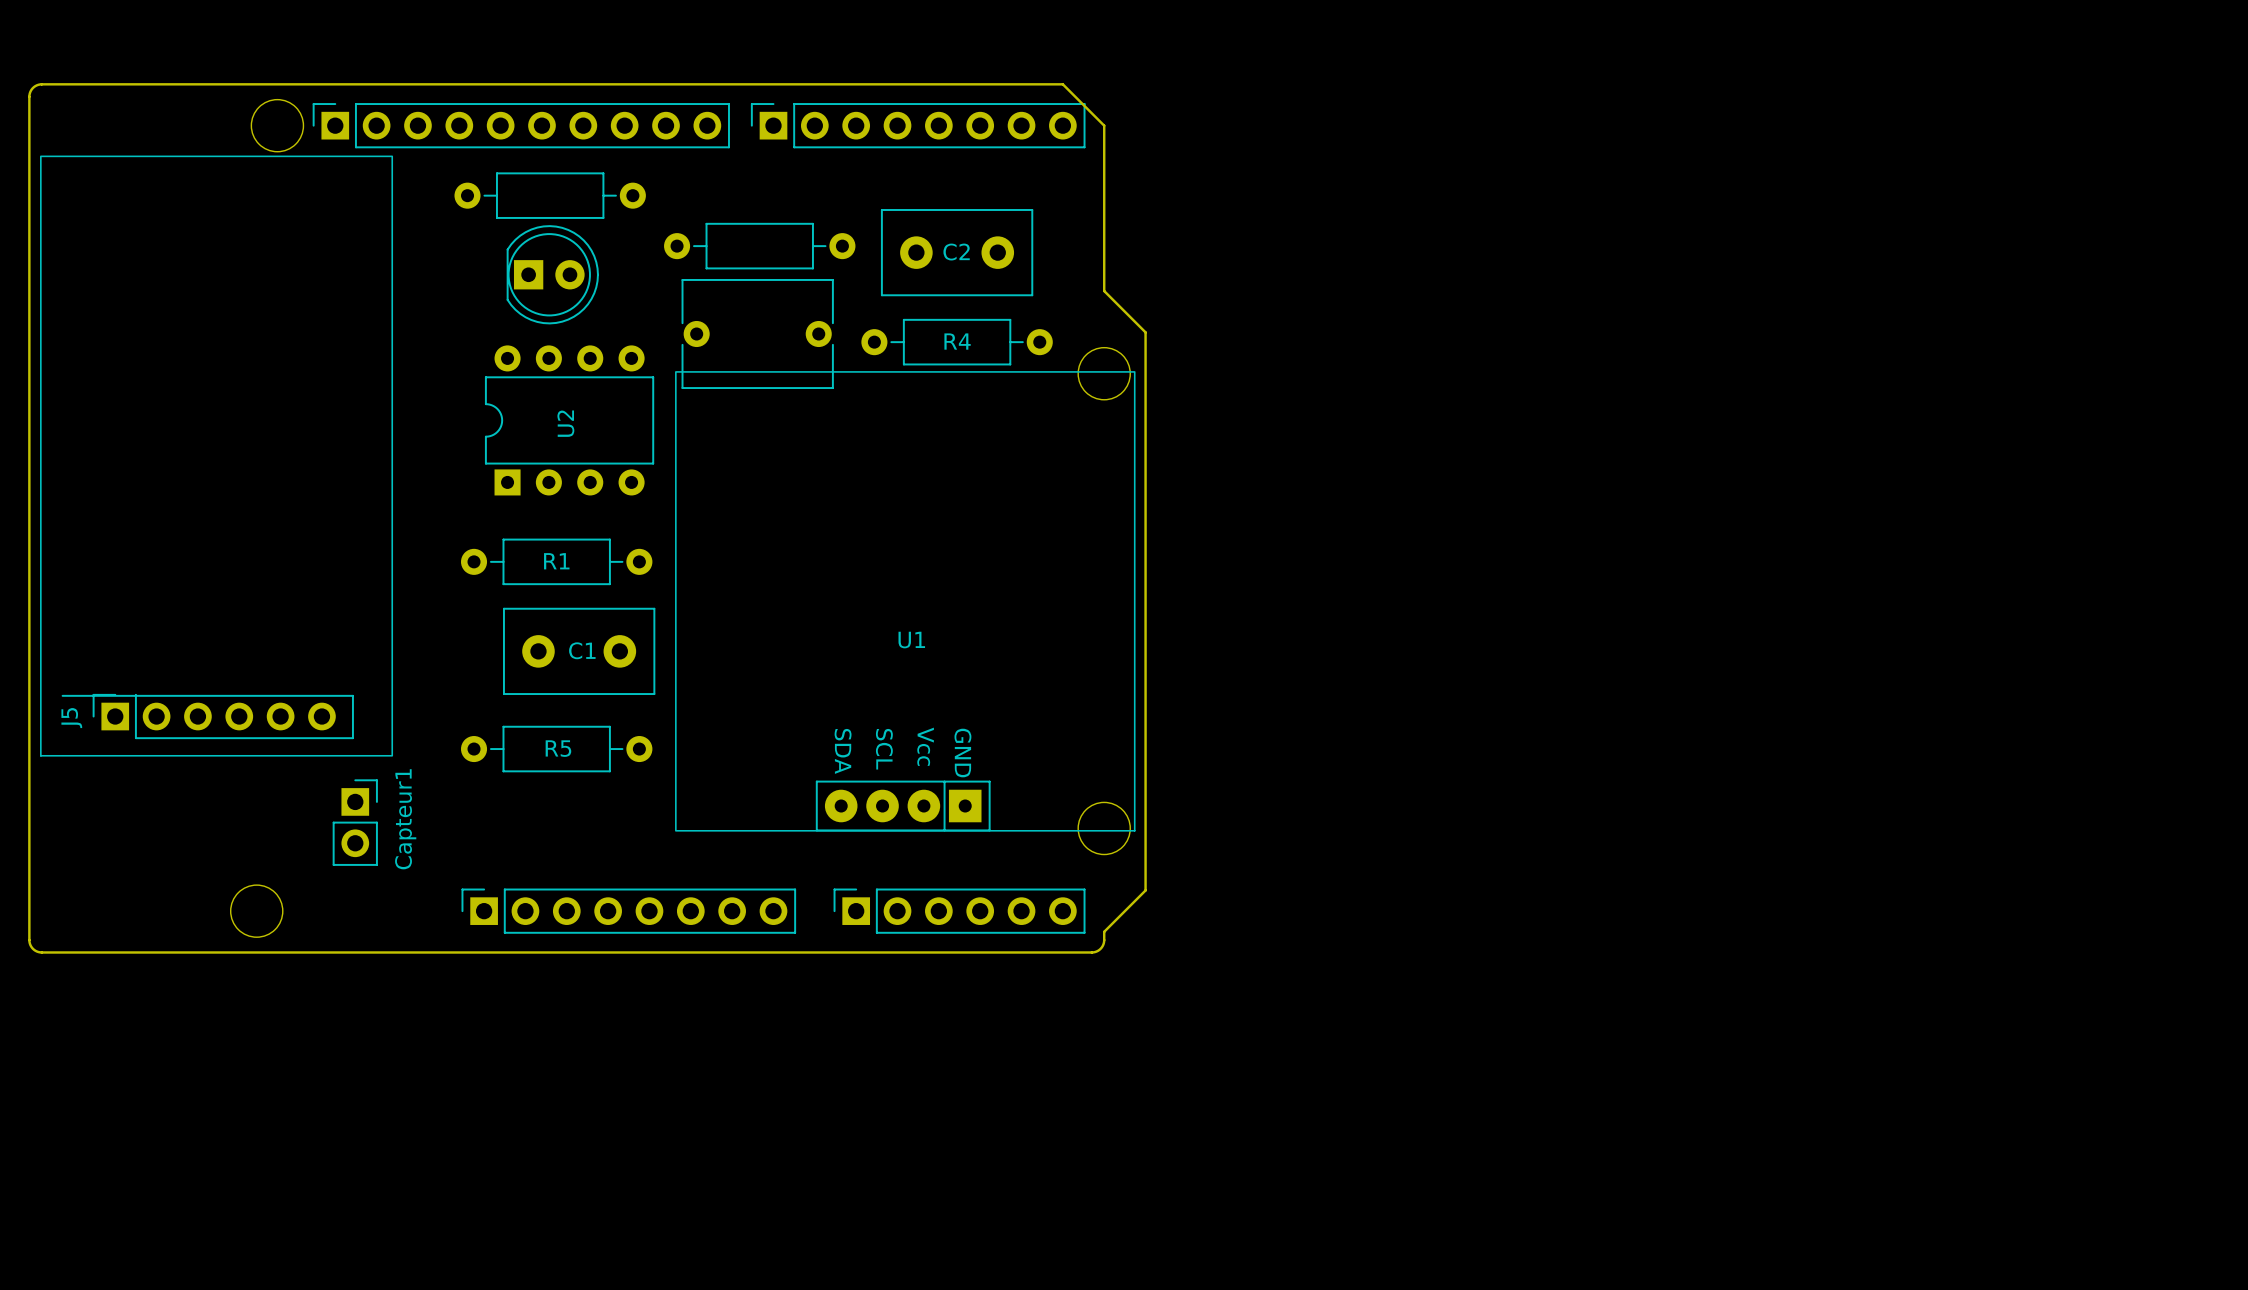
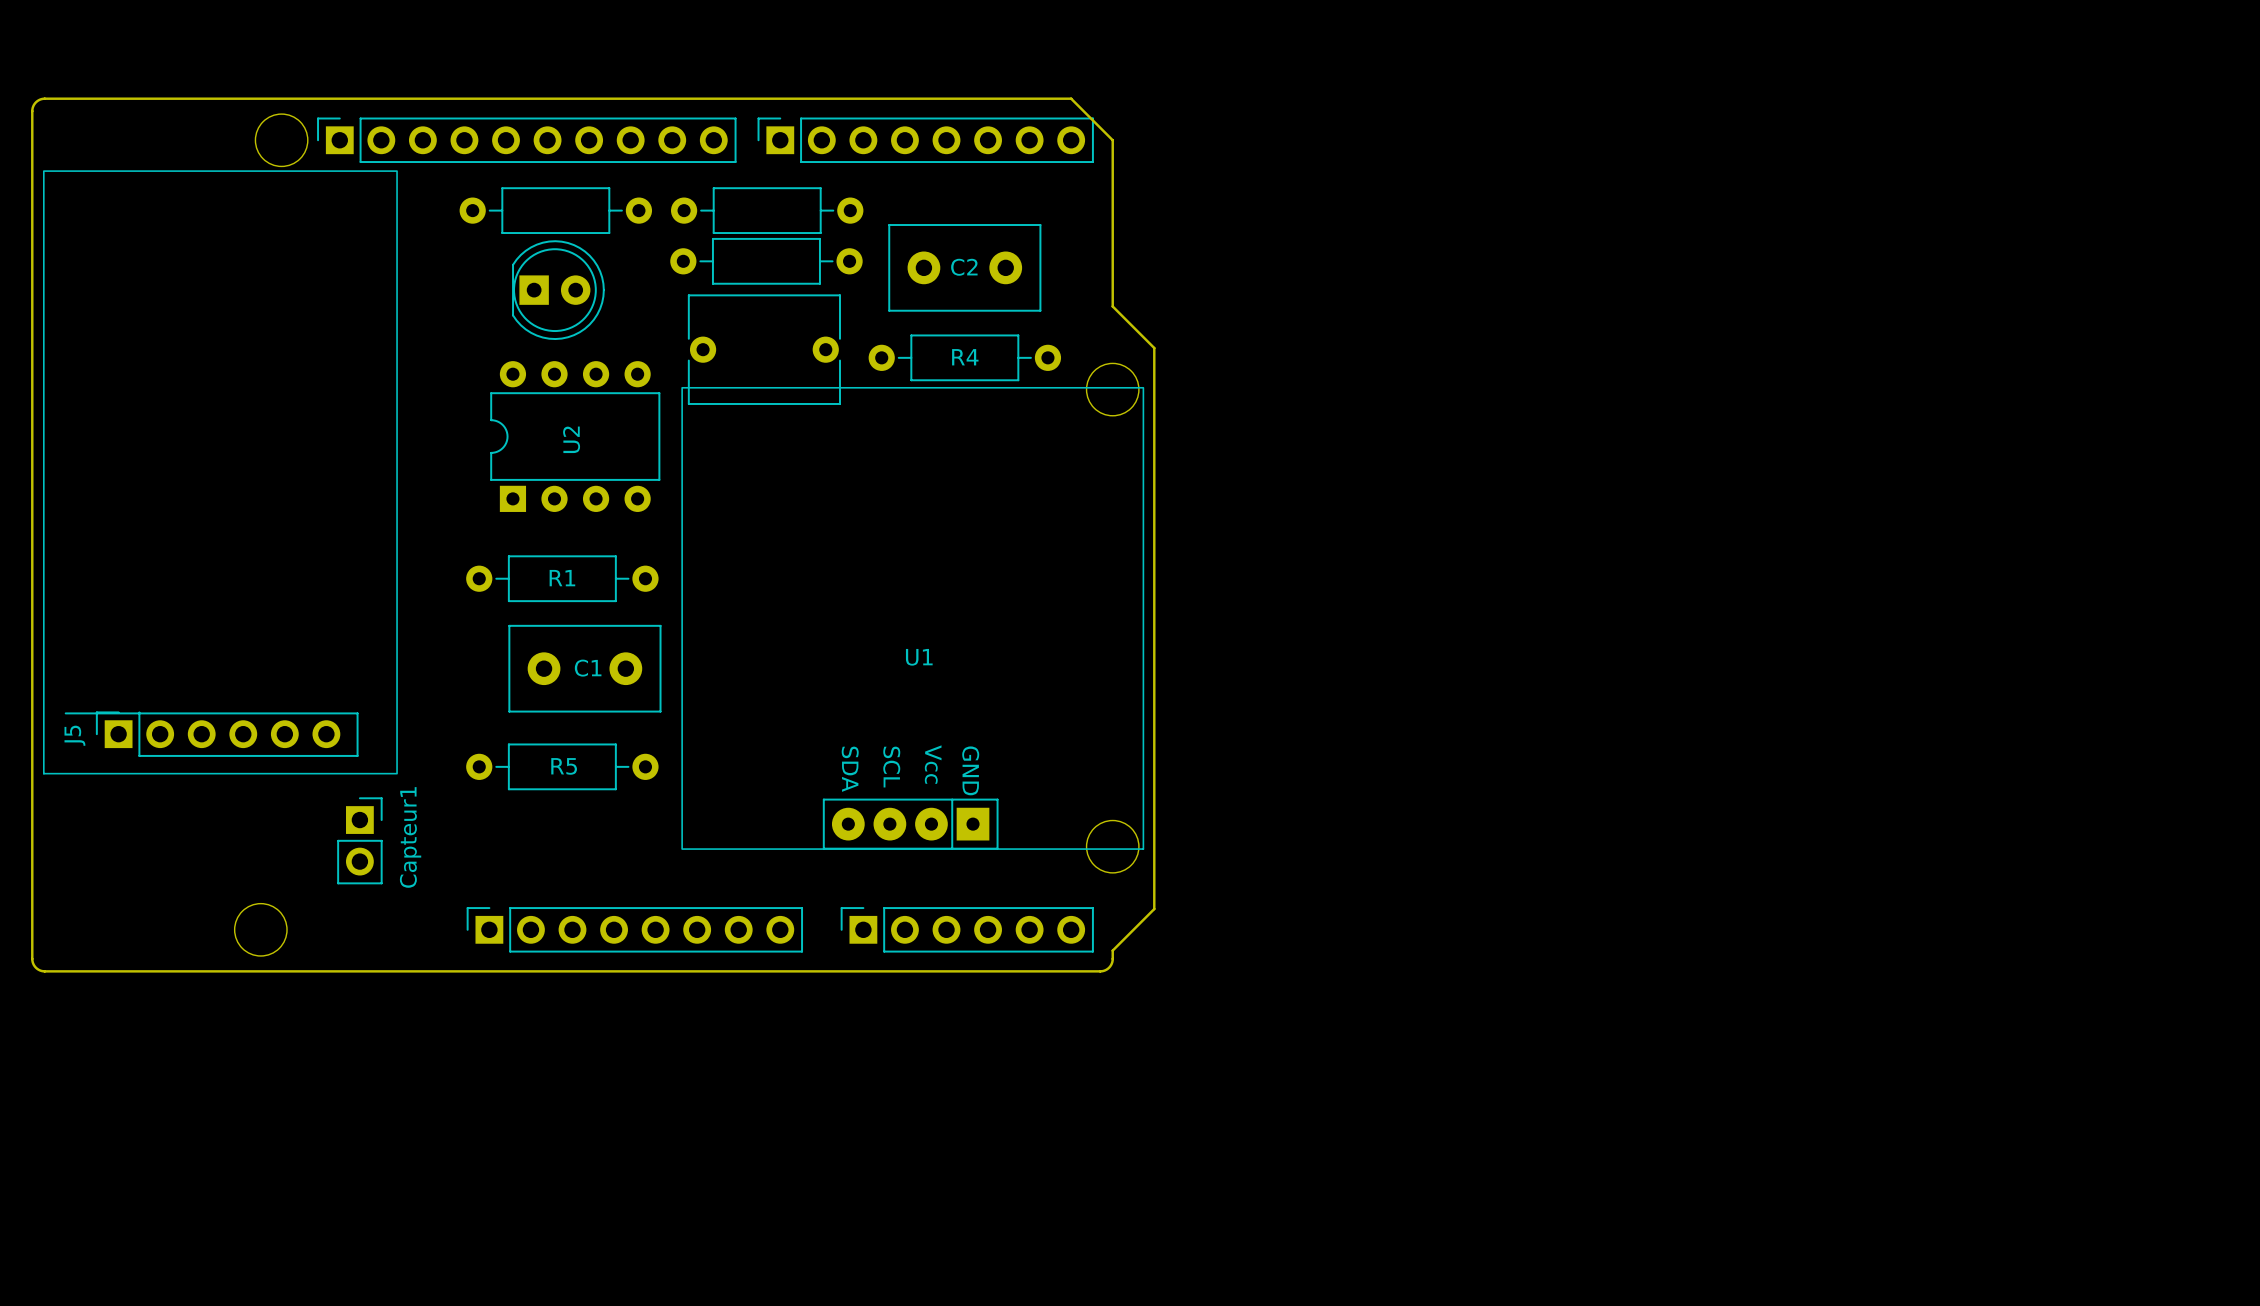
part: none -> (767, 210)

